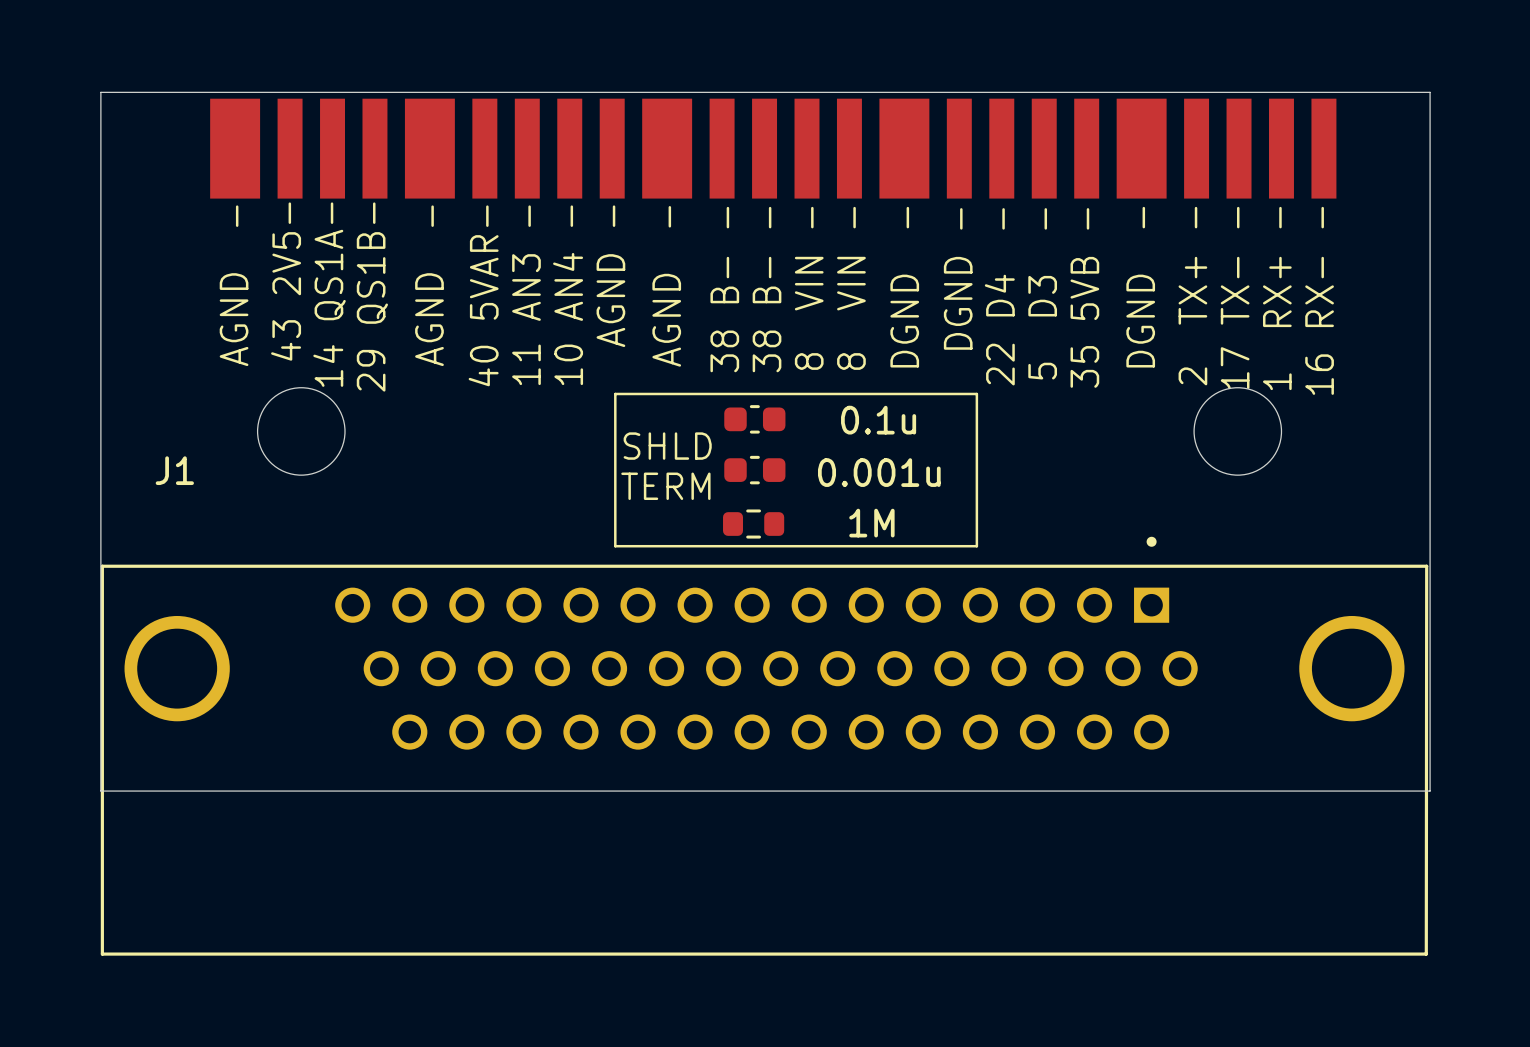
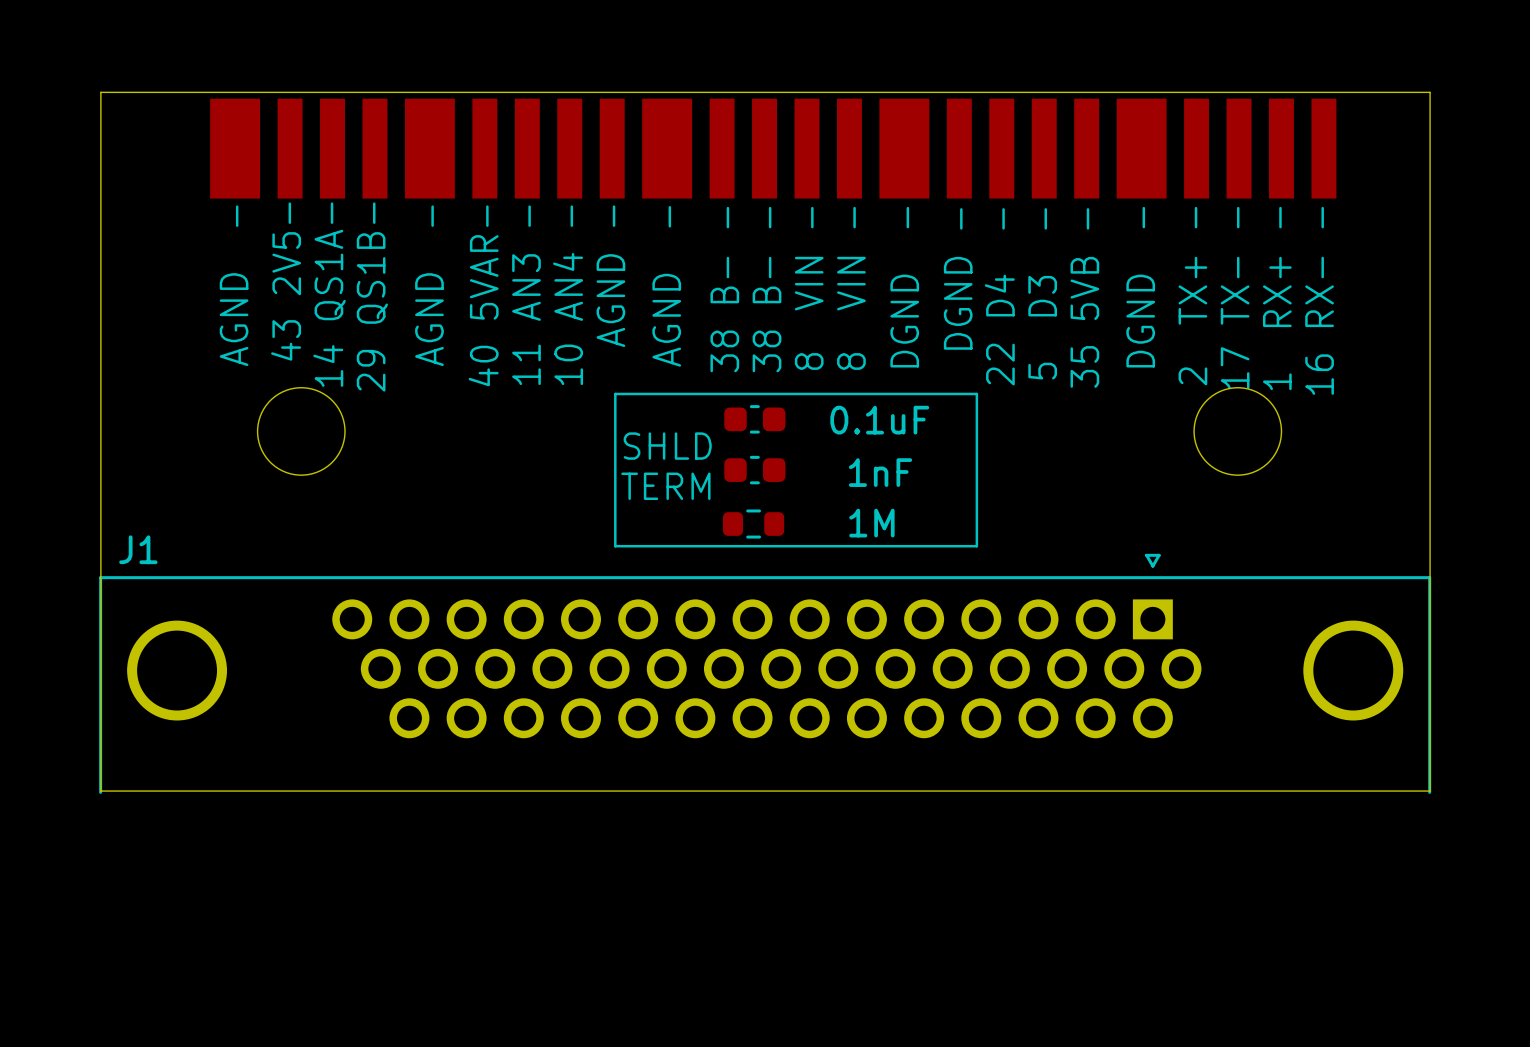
part value: 0.1u (878, 420) -> 0.1uF (879, 420)
J1 name position: J1 (174, 470) -> J1 (138, 549)
part value: 0.001u (879, 472) -> 1nF (880, 472)
J1 footprint: [100, 536, 1429, 956] -> [99, 553, 1432, 794]

